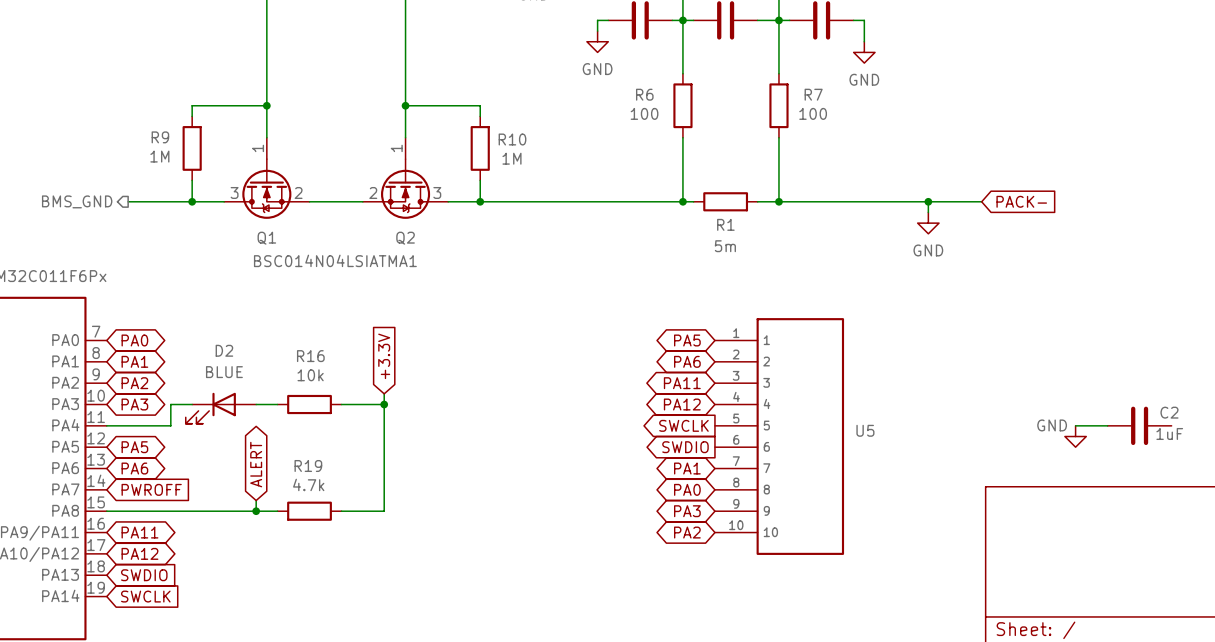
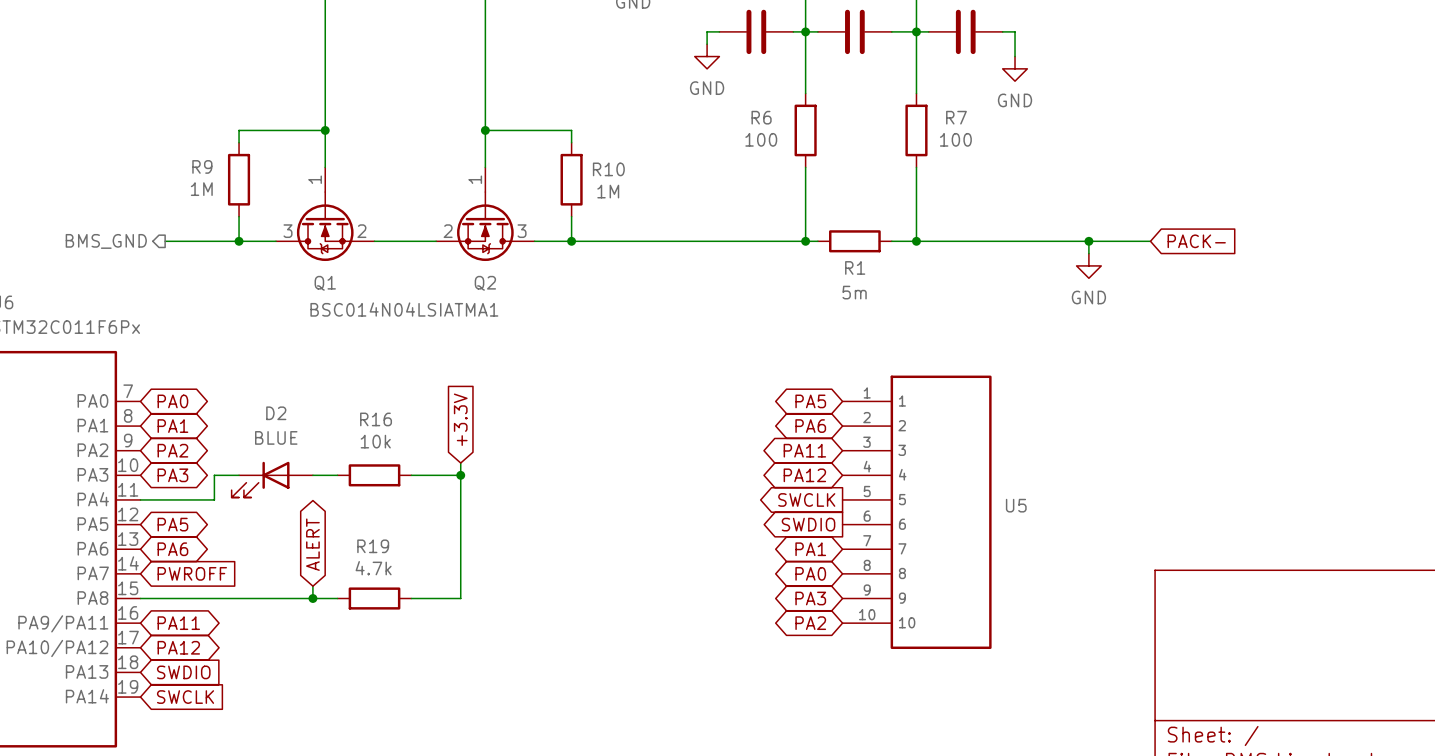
wire: (1075, 425) (1107, 425) -> none
C2: 1uF (1139, 425) -> none
power symbol: GND (1075, 436) -> none

